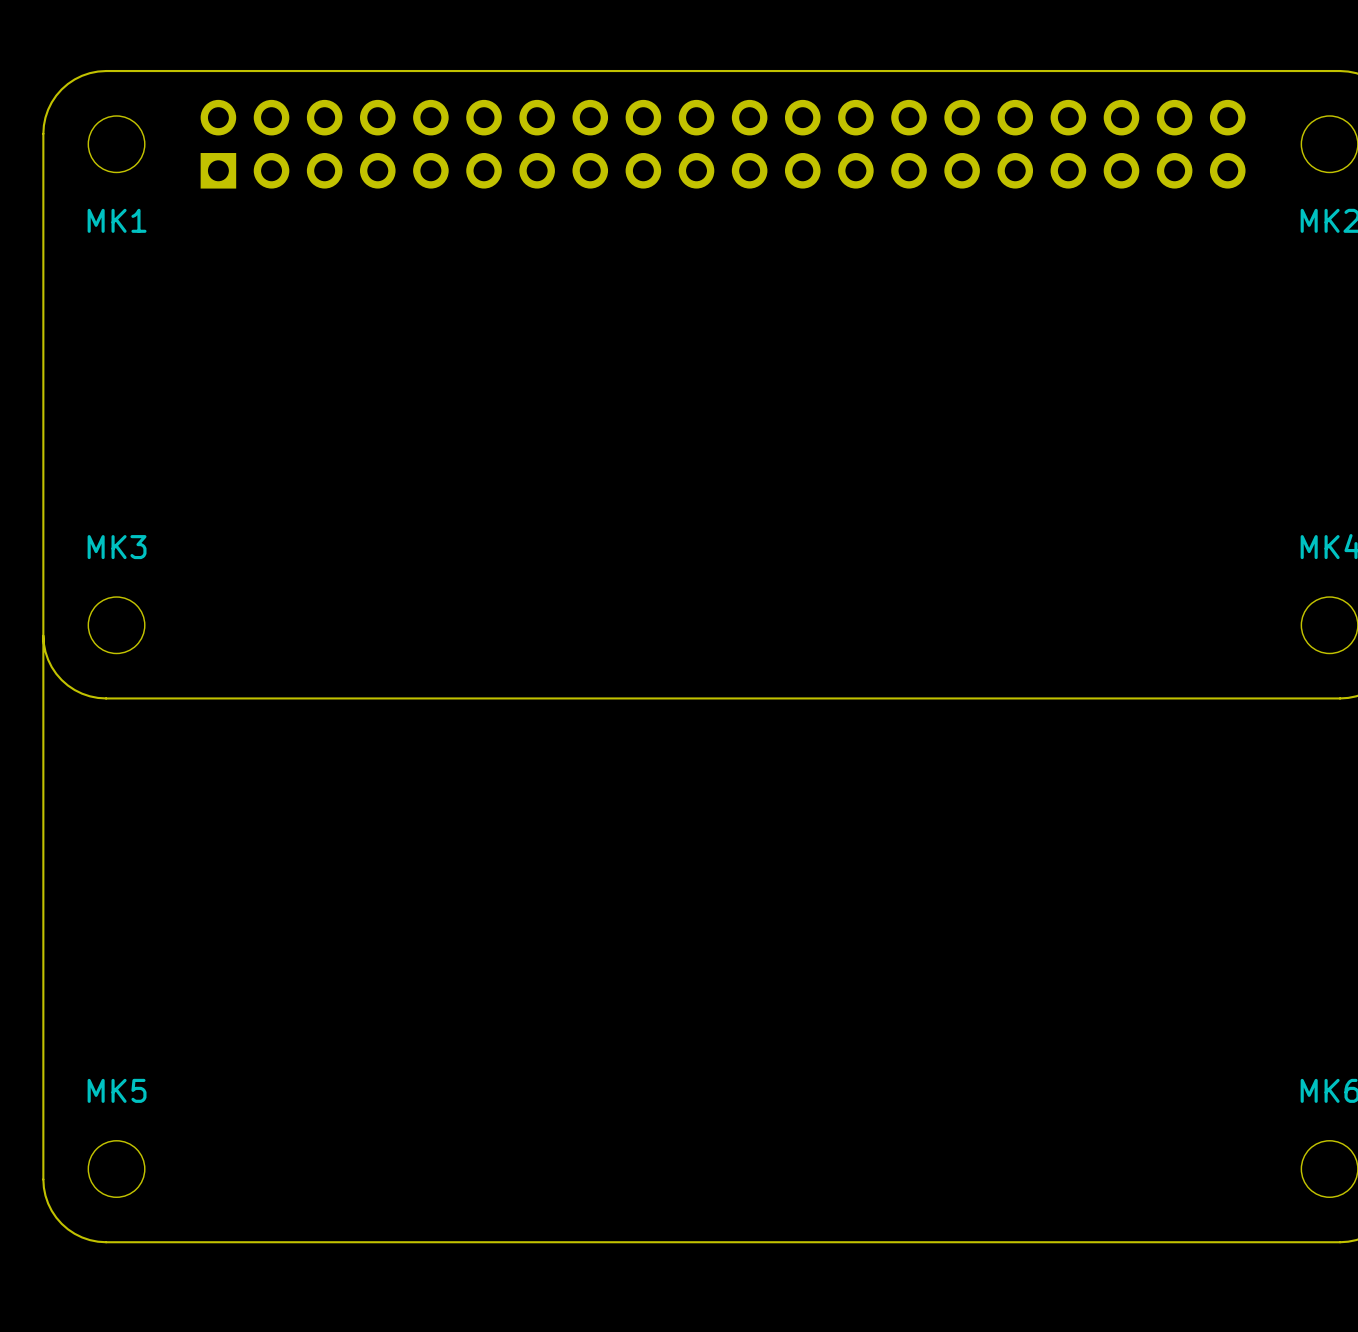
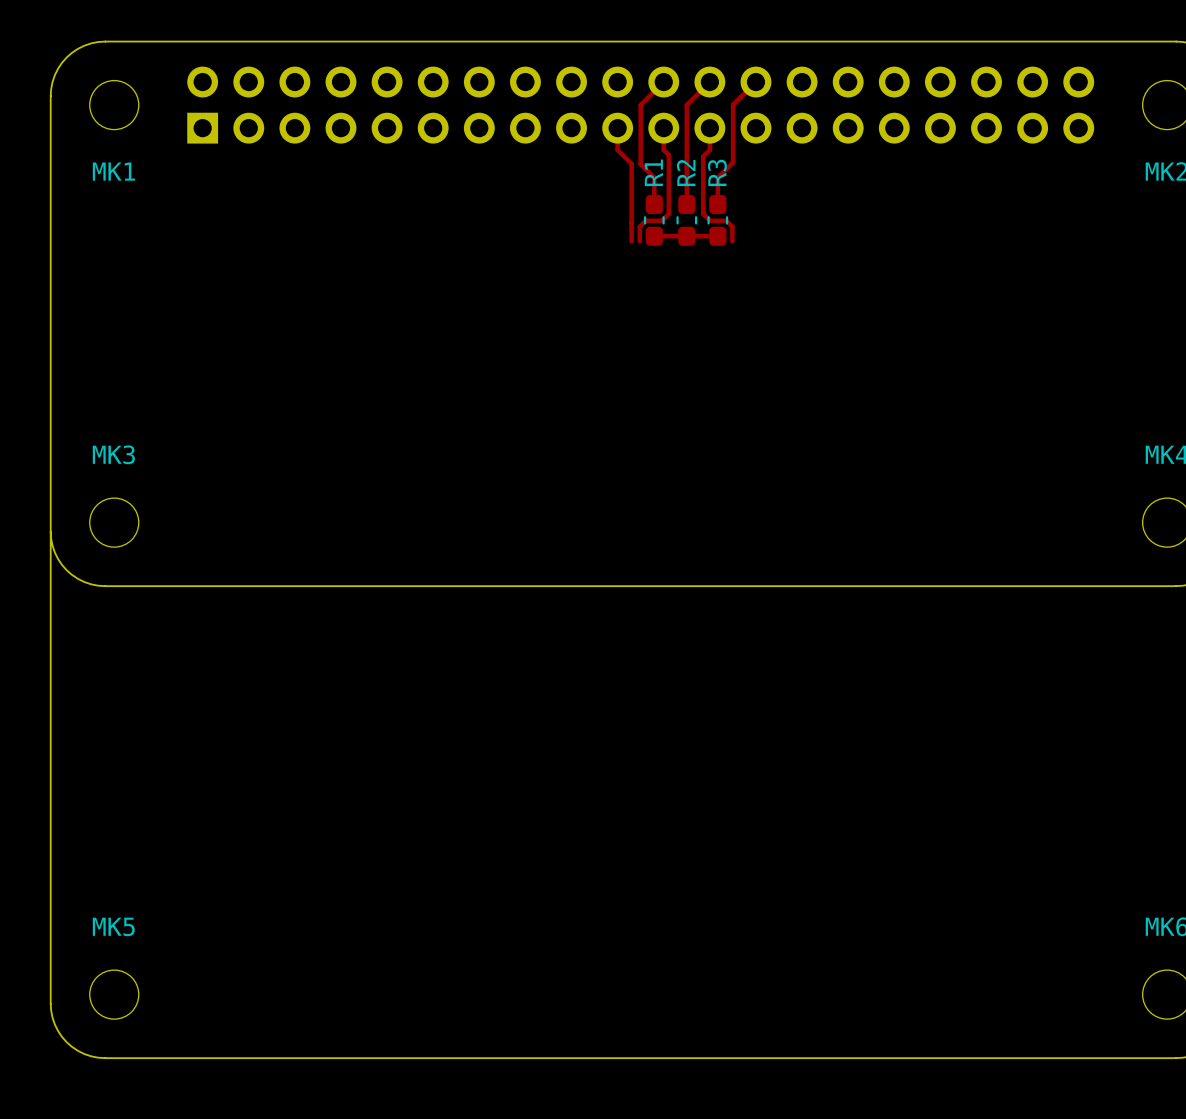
track: none -> (663, 82) (640, 105) (640, 164) (654, 177) (654, 204)
track: none -> (709, 82) (686, 105) (686, 204)
track: none -> (755, 82) (733, 104) (733, 162) (717, 177) (717, 204)
track: none -> (617, 128) (617, 149) (631, 163) (631, 241)
track: none -> (663, 128) (663, 149) (668, 155) (668, 213) (661, 220) (645, 220) (639, 226) (639, 241)
track: none -> (709, 128) (709, 149) (703, 156) (703, 213) (710, 220) (726, 220) (732, 226) (732, 241)
R1: none -> (654, 220)
R2: none -> (686, 220)
R3: none -> (717, 220)
track: none -> (649, 236) (717, 236)

